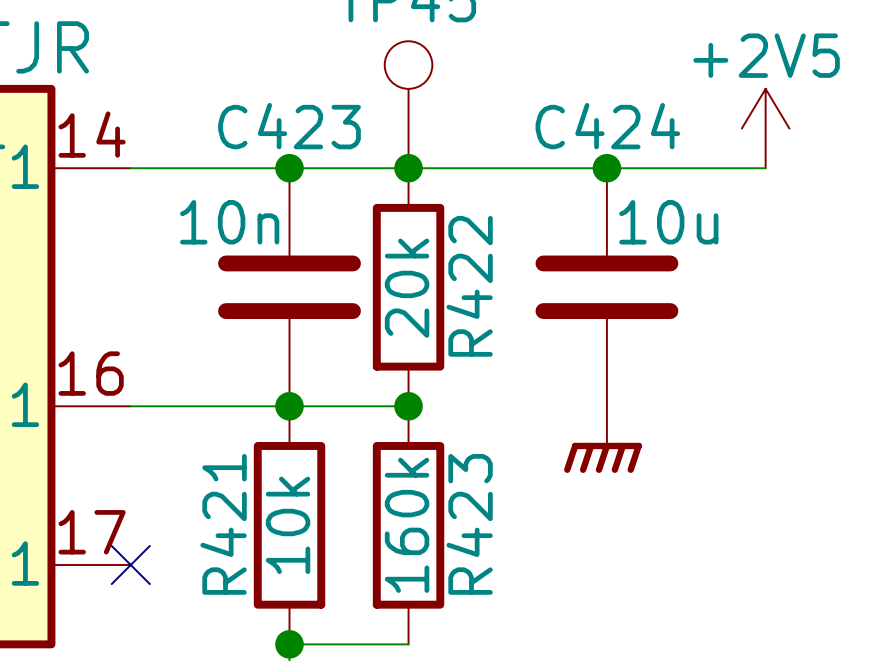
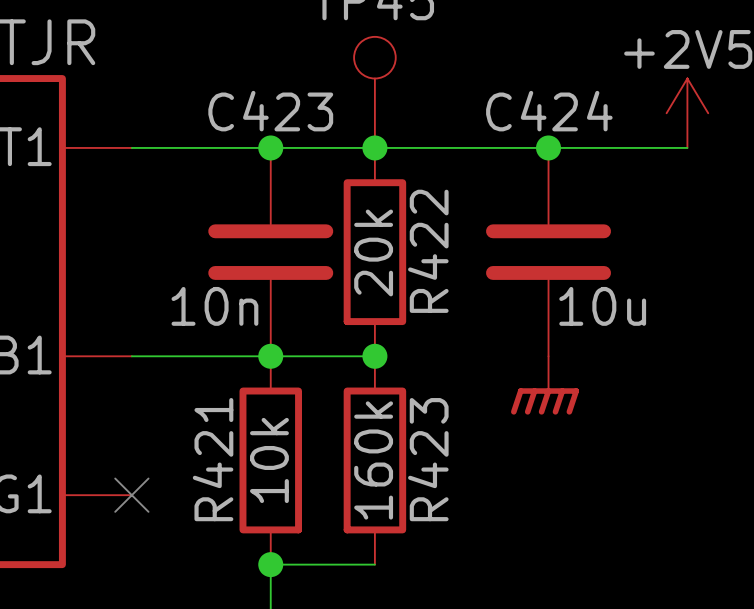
part pin number: 14 (92, 134) -> none
C423 value position: 10n (229, 222) -> 10n (214, 306)
C424 value position: 10u (668, 222) -> 10u (602, 306)
part pin number: 16 (91, 373) -> none
part pin number: 17 (92, 532) -> none

